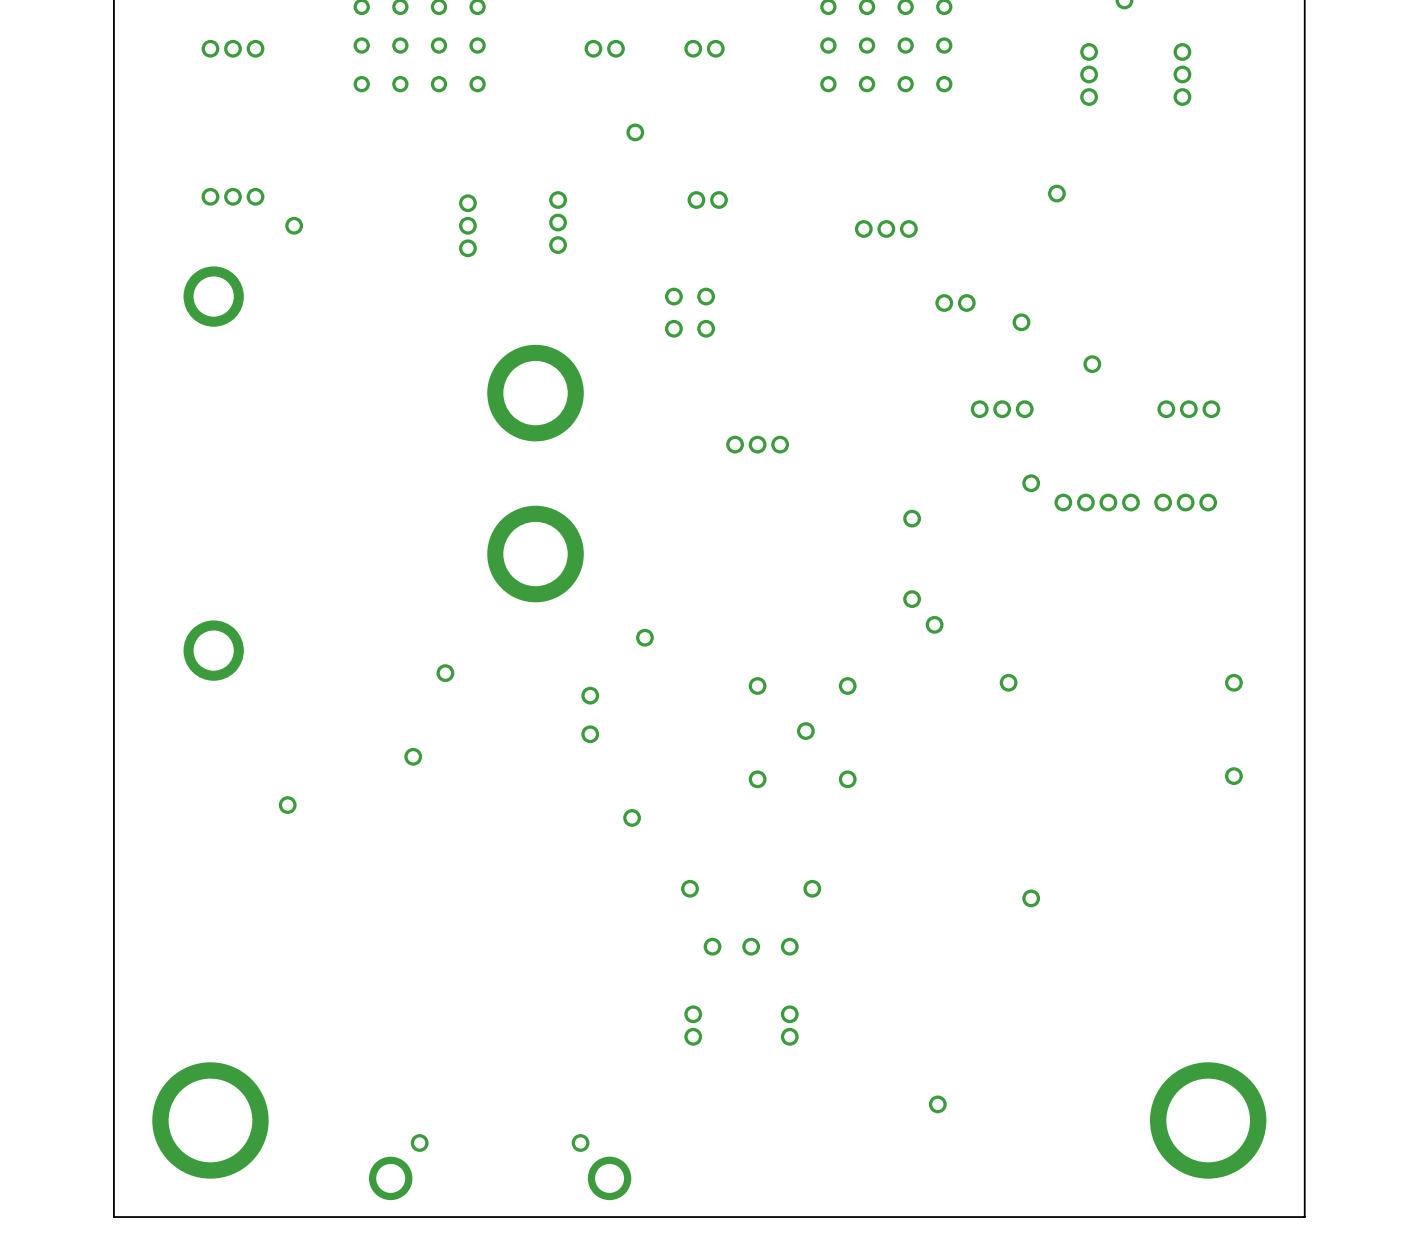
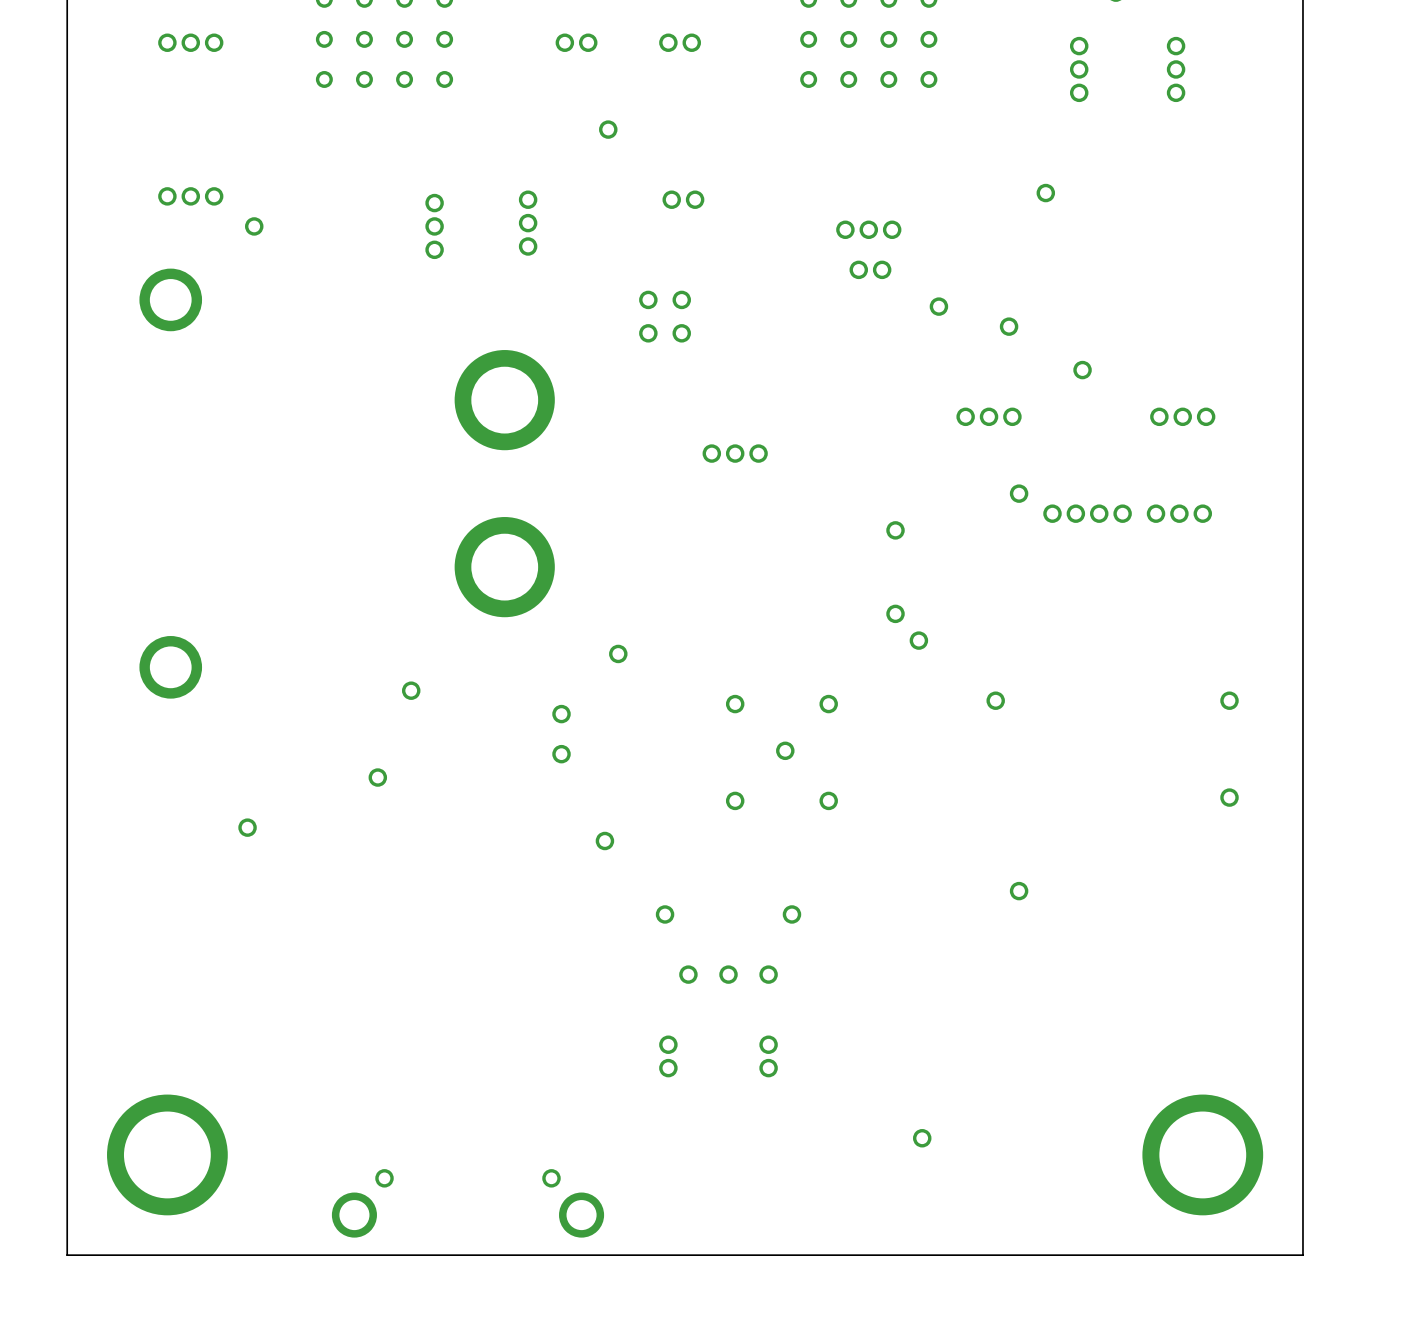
via: none -> (858, 269)
via: none -> (882, 269)
via: (944, 303) -> none
via: none -> (938, 306)
via: (966, 303) -> none
via position: (1031, 898) -> (1019, 891)

